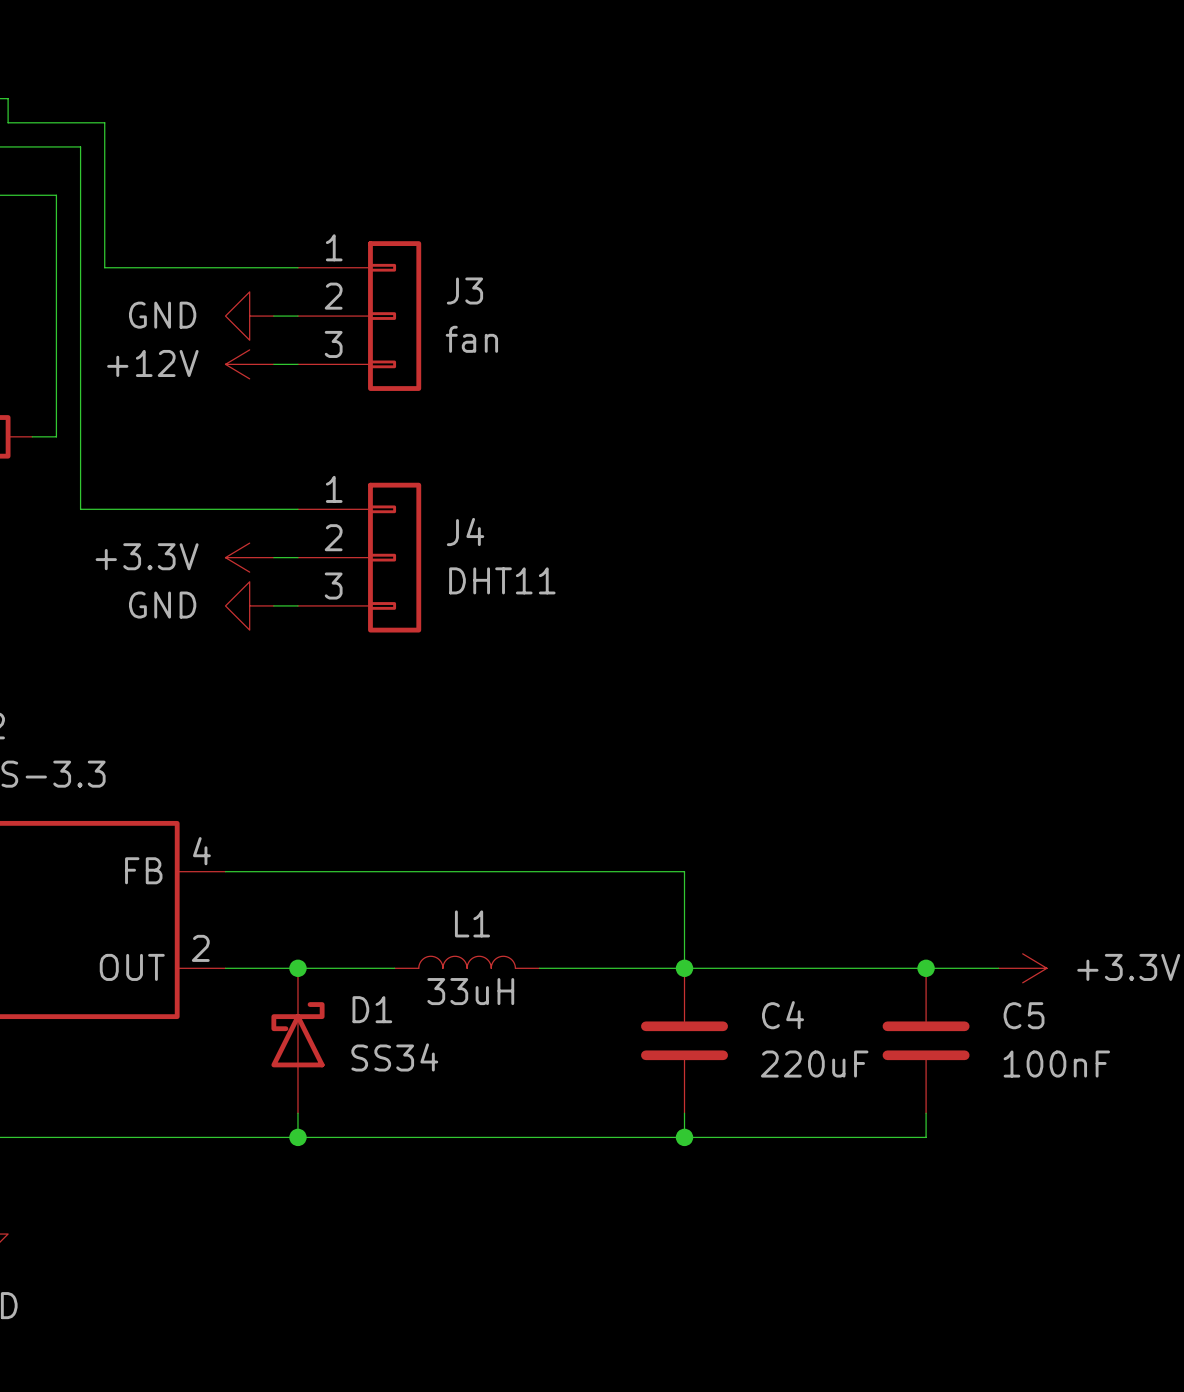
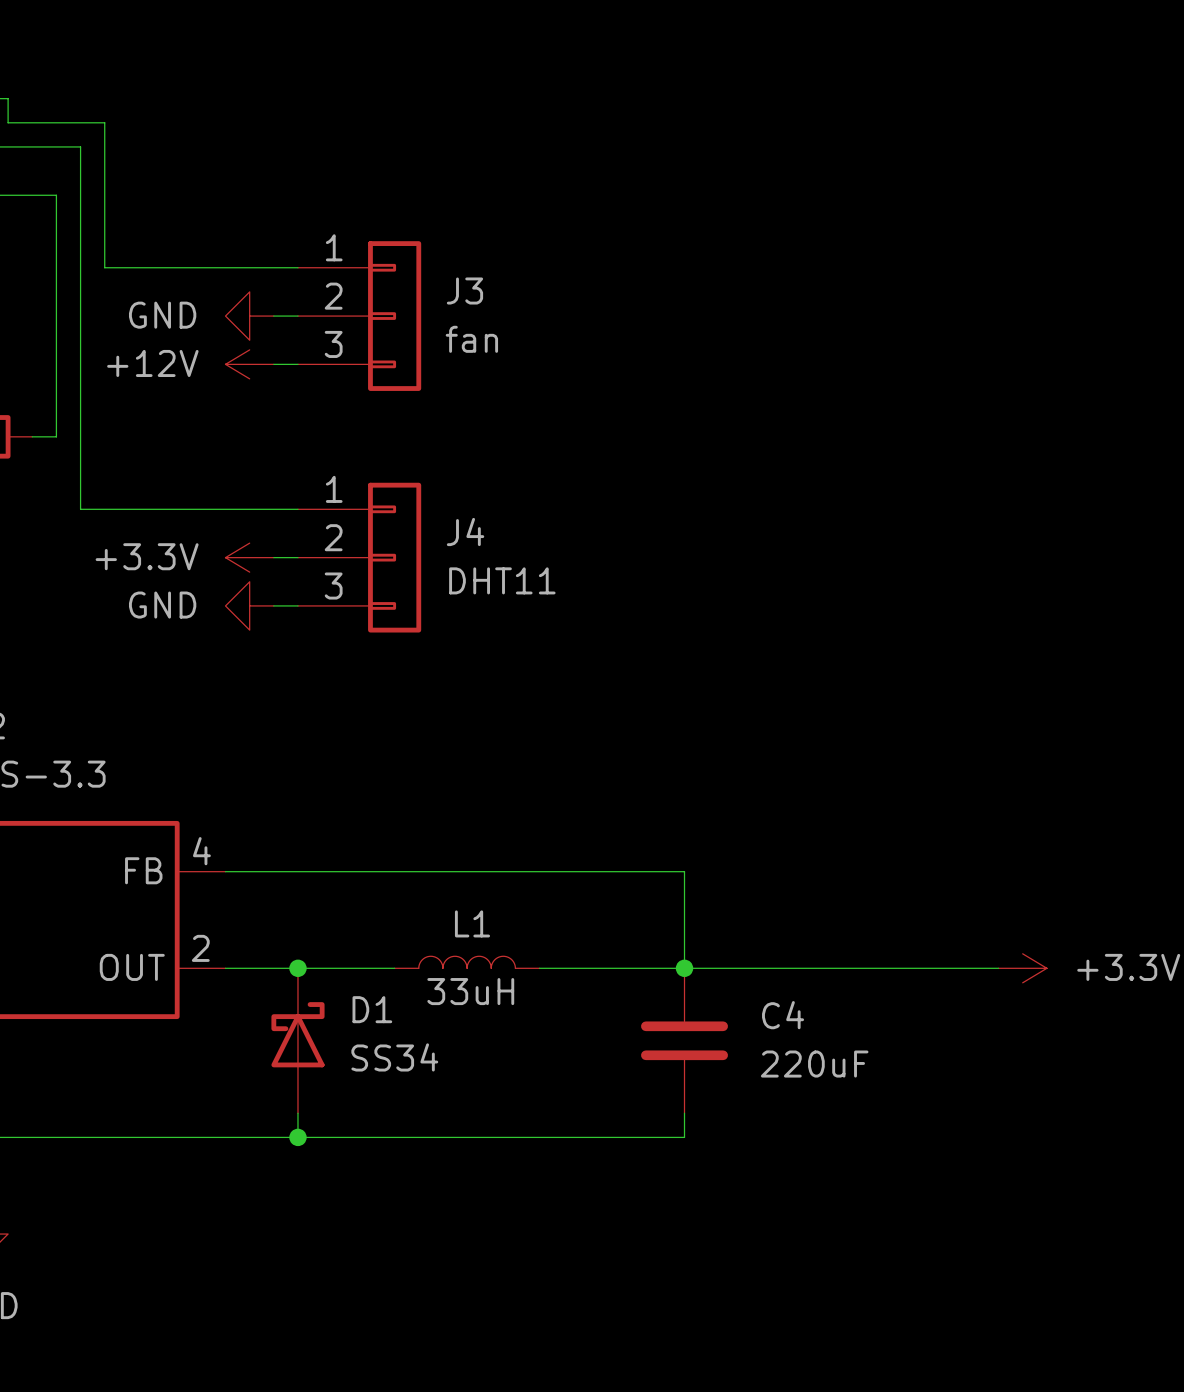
junction: (926, 968) -> none
C5: 100nF (926, 1040) -> none
wire: (926, 1113) (926, 1137) (684, 1137) -> none
junction: (684, 1137) -> none

